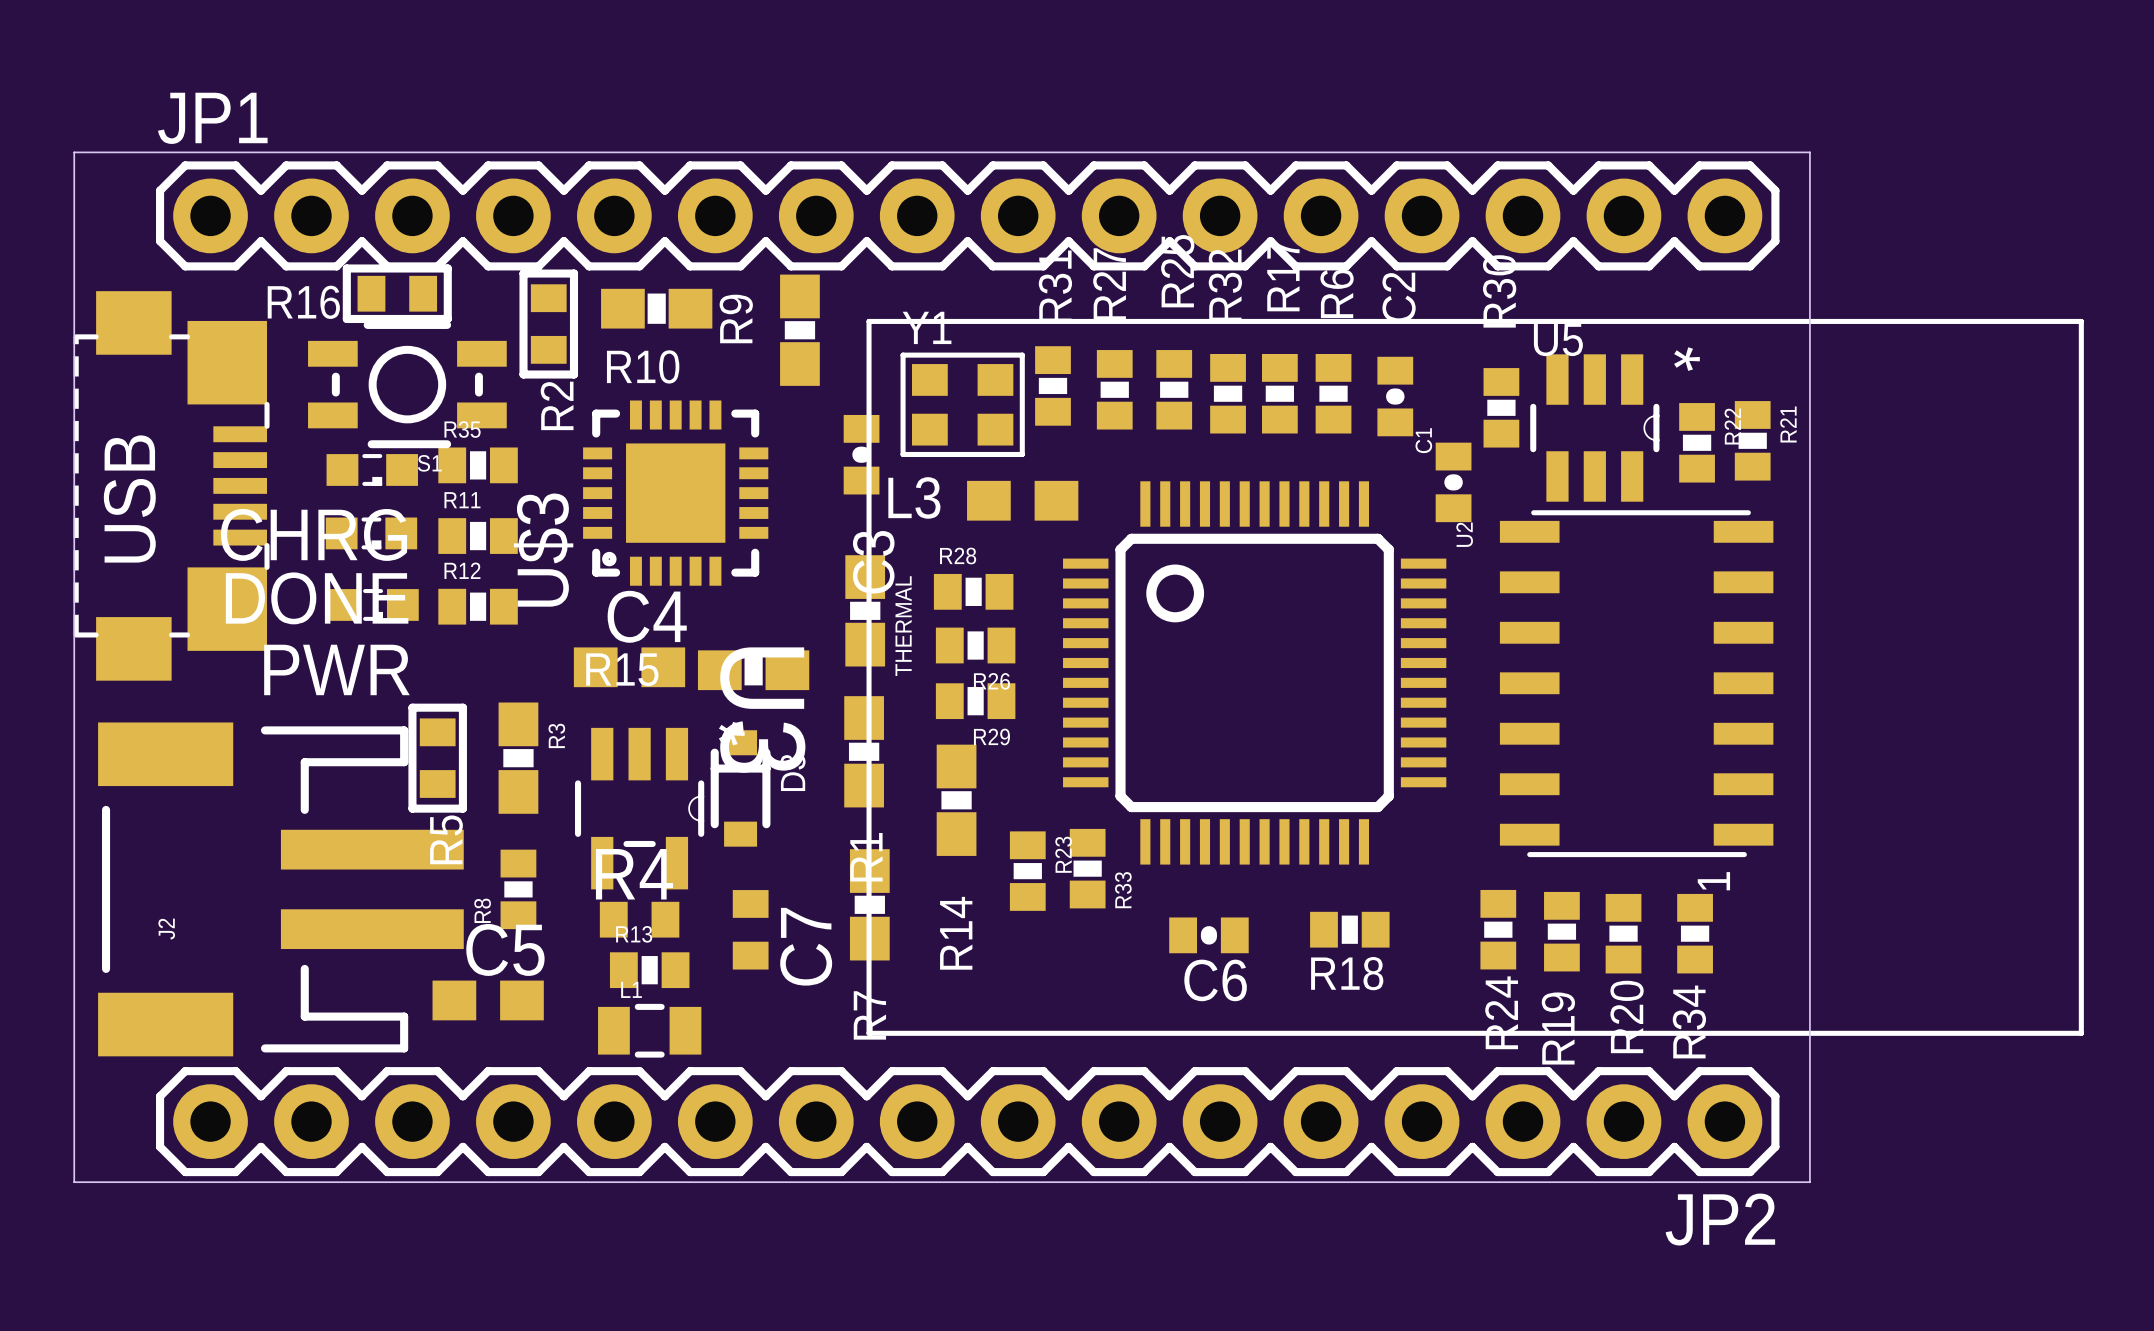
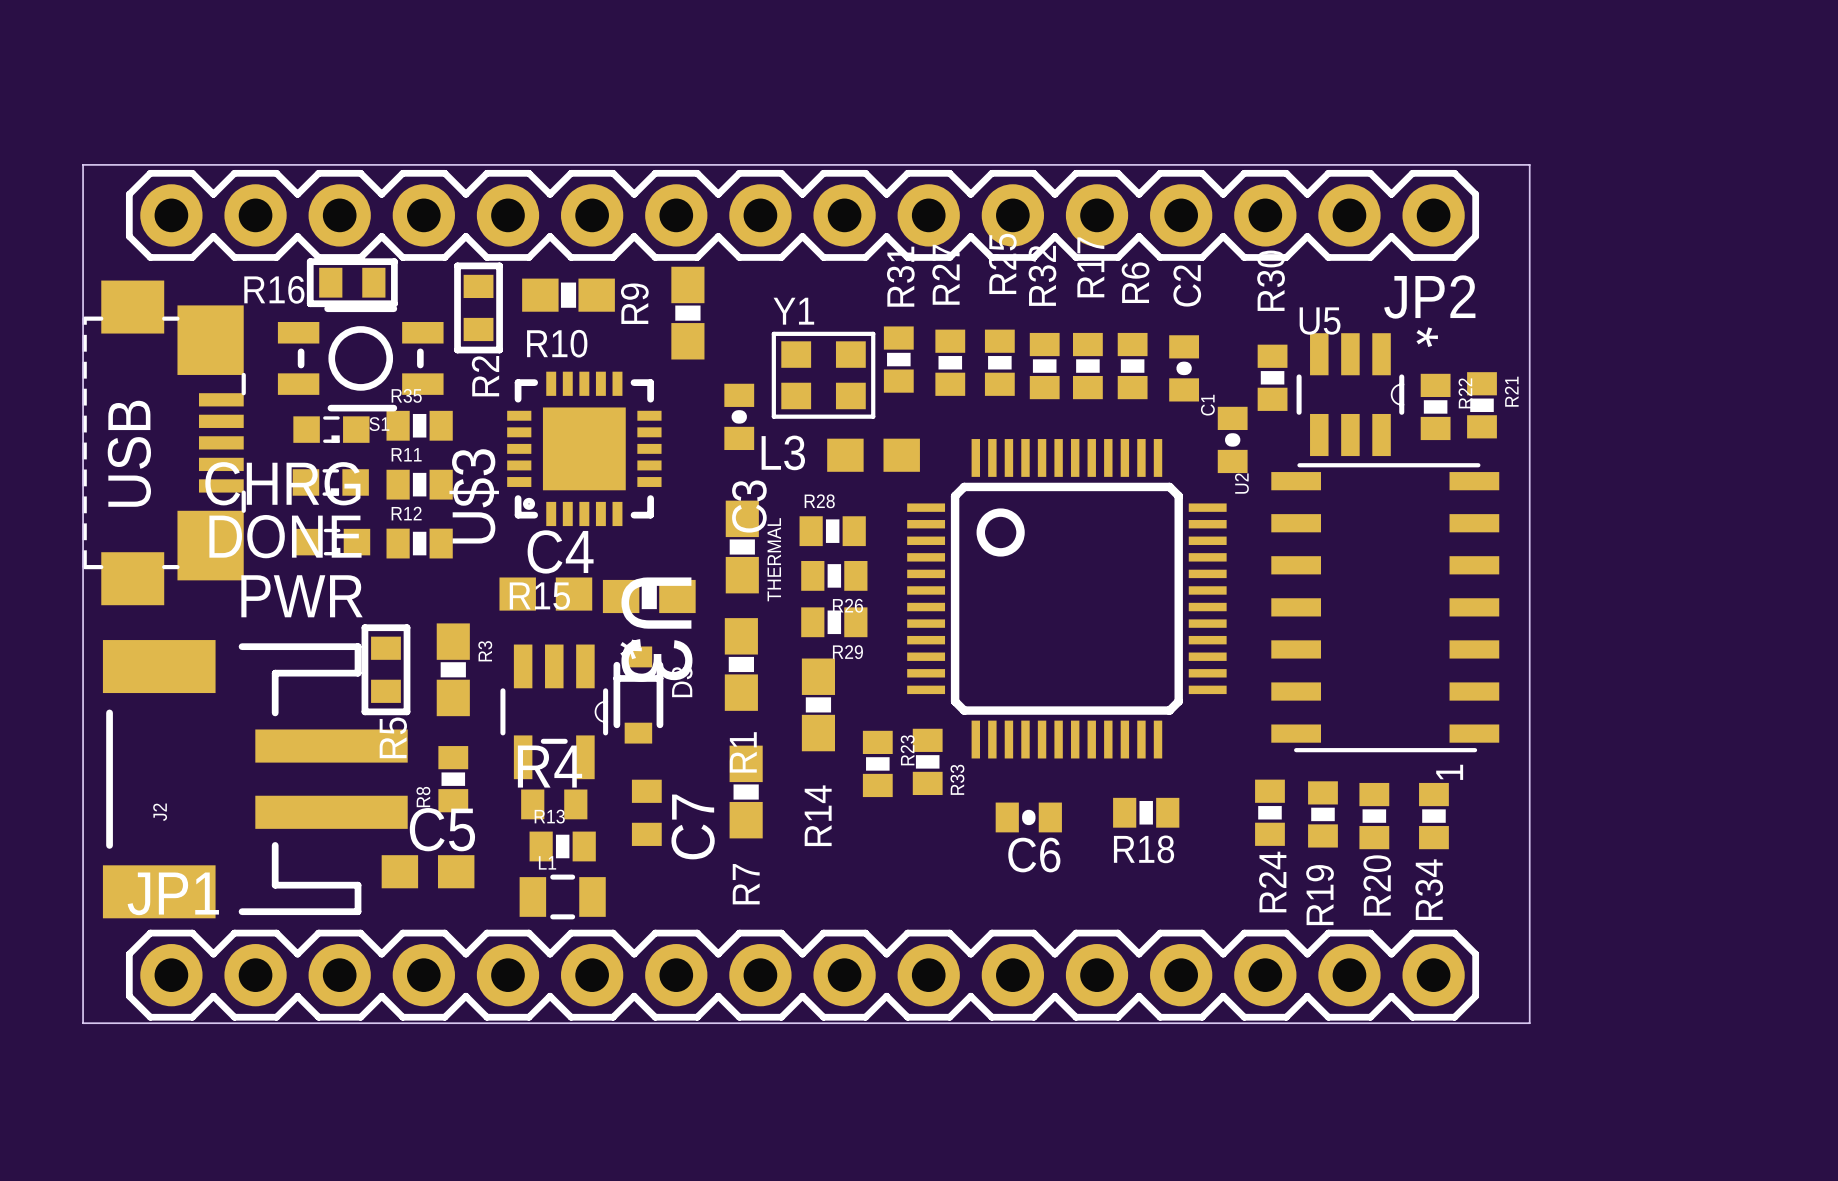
JP1 position: (967, 215) -> (802, 975)
part: (1475, 677) -> none
JP2 position: (967, 1121) -> (802, 215)

